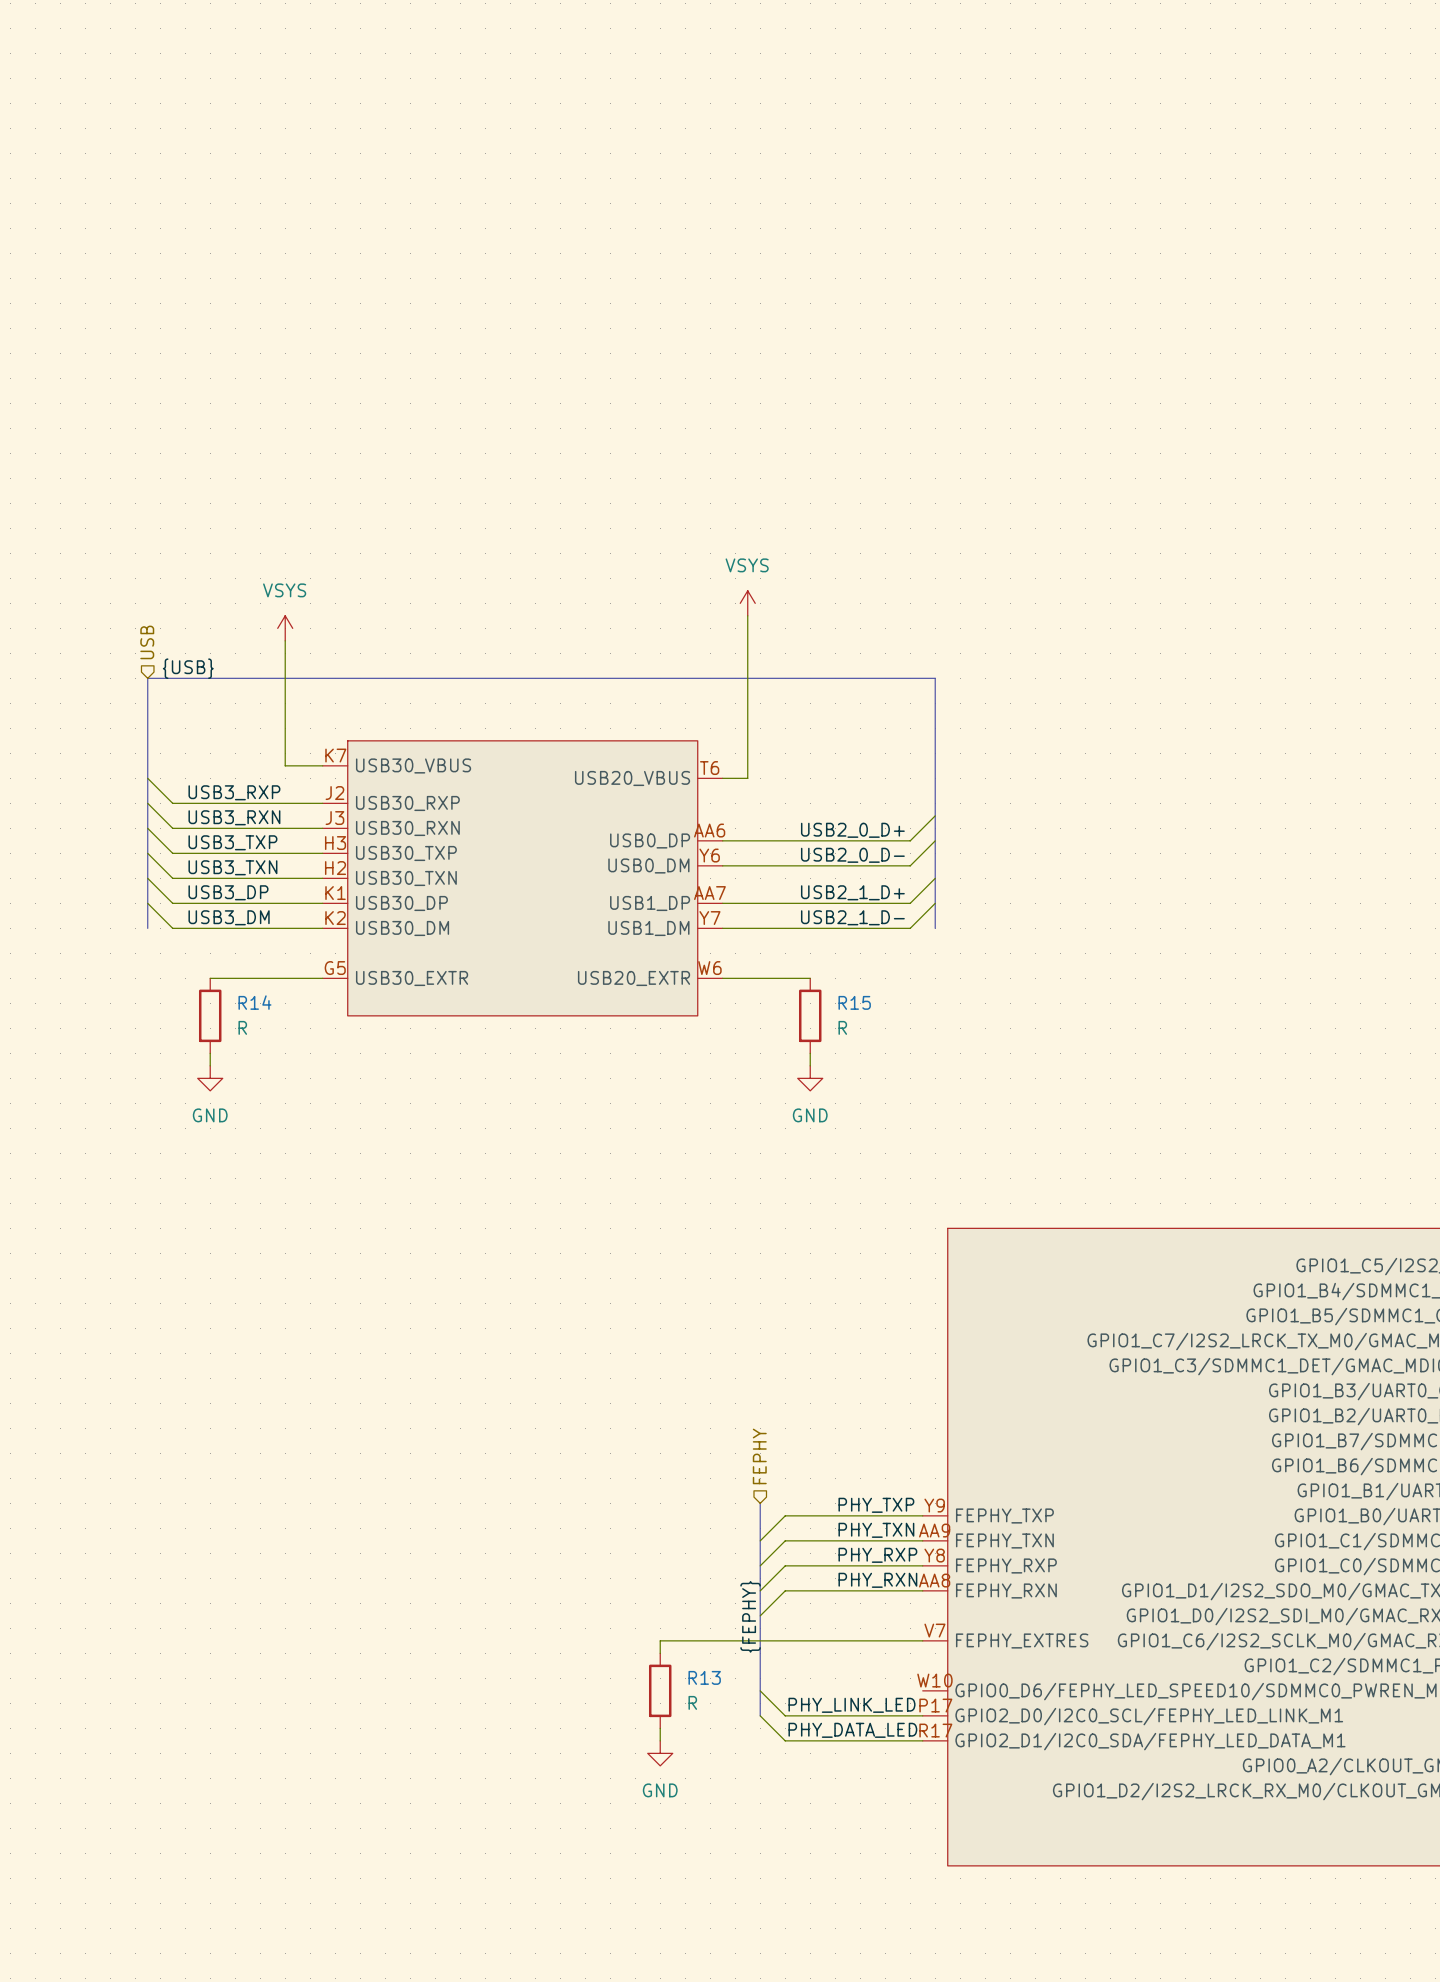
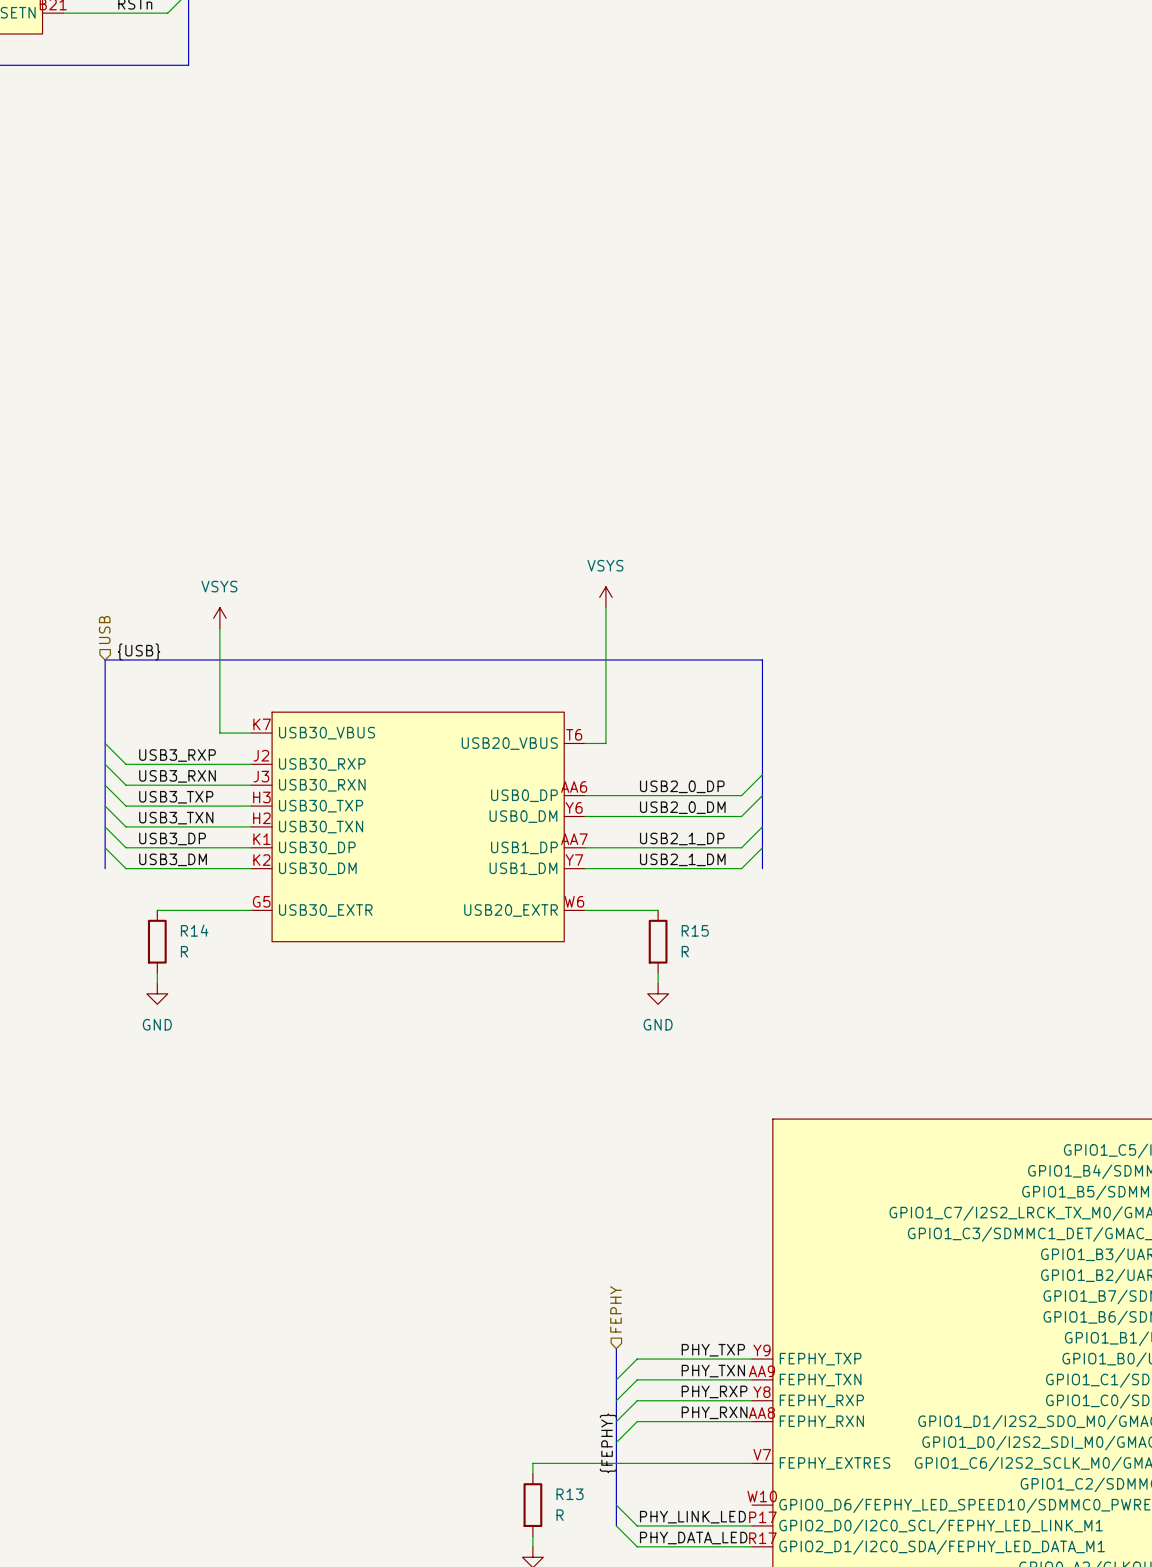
label: USB2_0_D+ (852, 830) -> USB2_0_DP (682, 786)
label: USB2_0_D- (852, 855) -> USB2_0_DM (682, 807)
label: USB2_1_D+ (852, 892) -> USB2_1_DP (682, 838)
label: USB2_1_D- (852, 917) -> USB2_1_DM (682, 859)

